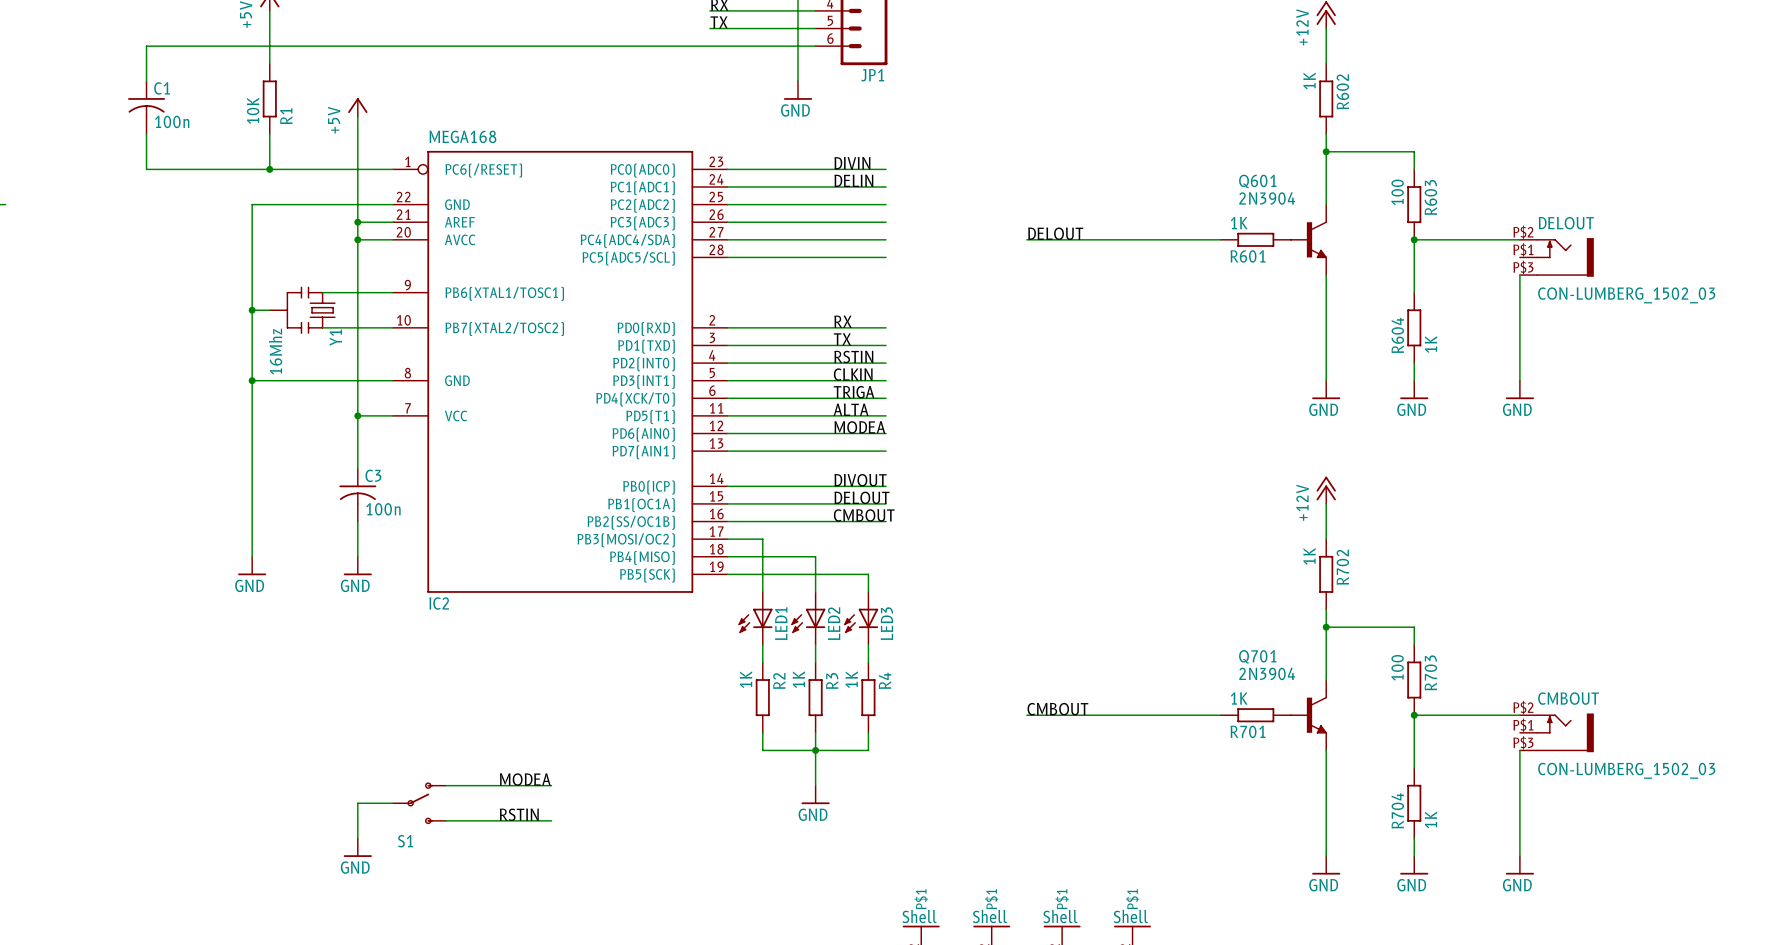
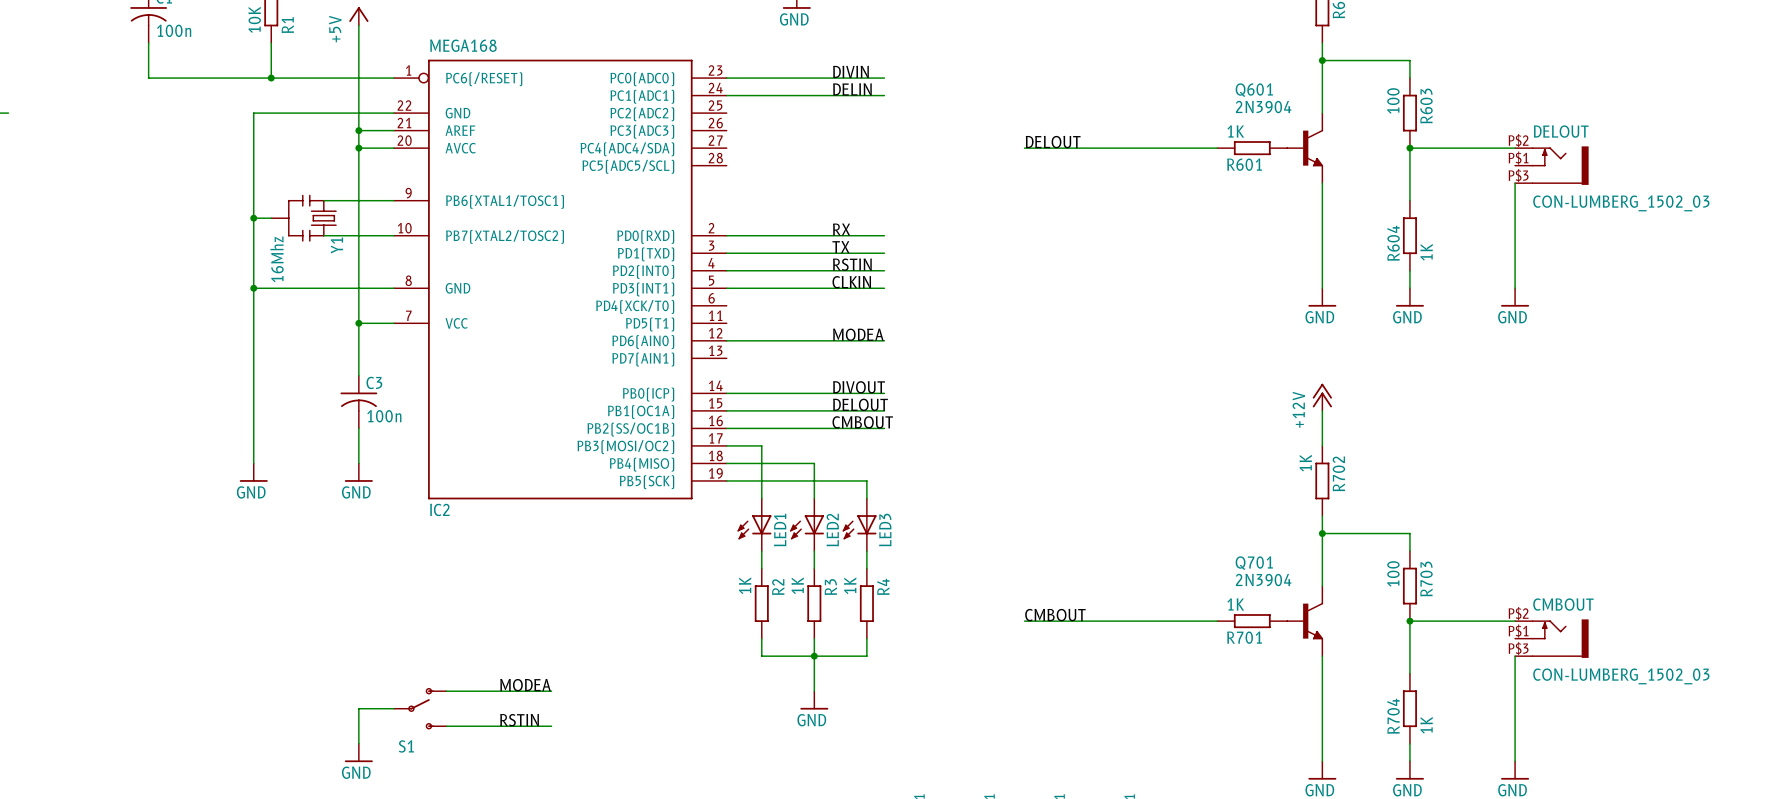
wire: (727, 204) (886, 204) -> none
wire: (727, 222) (886, 222) -> none
wire: (727, 239) (886, 239) -> none
wire: (727, 257) (886, 257) -> none
label: TRIGA (854, 392) -> none
wire: (727, 398) (886, 398) -> none
label: ALTA (851, 409) -> none
wire: (727, 415) (886, 415) -> none
wire: (727, 451) (886, 451) -> none

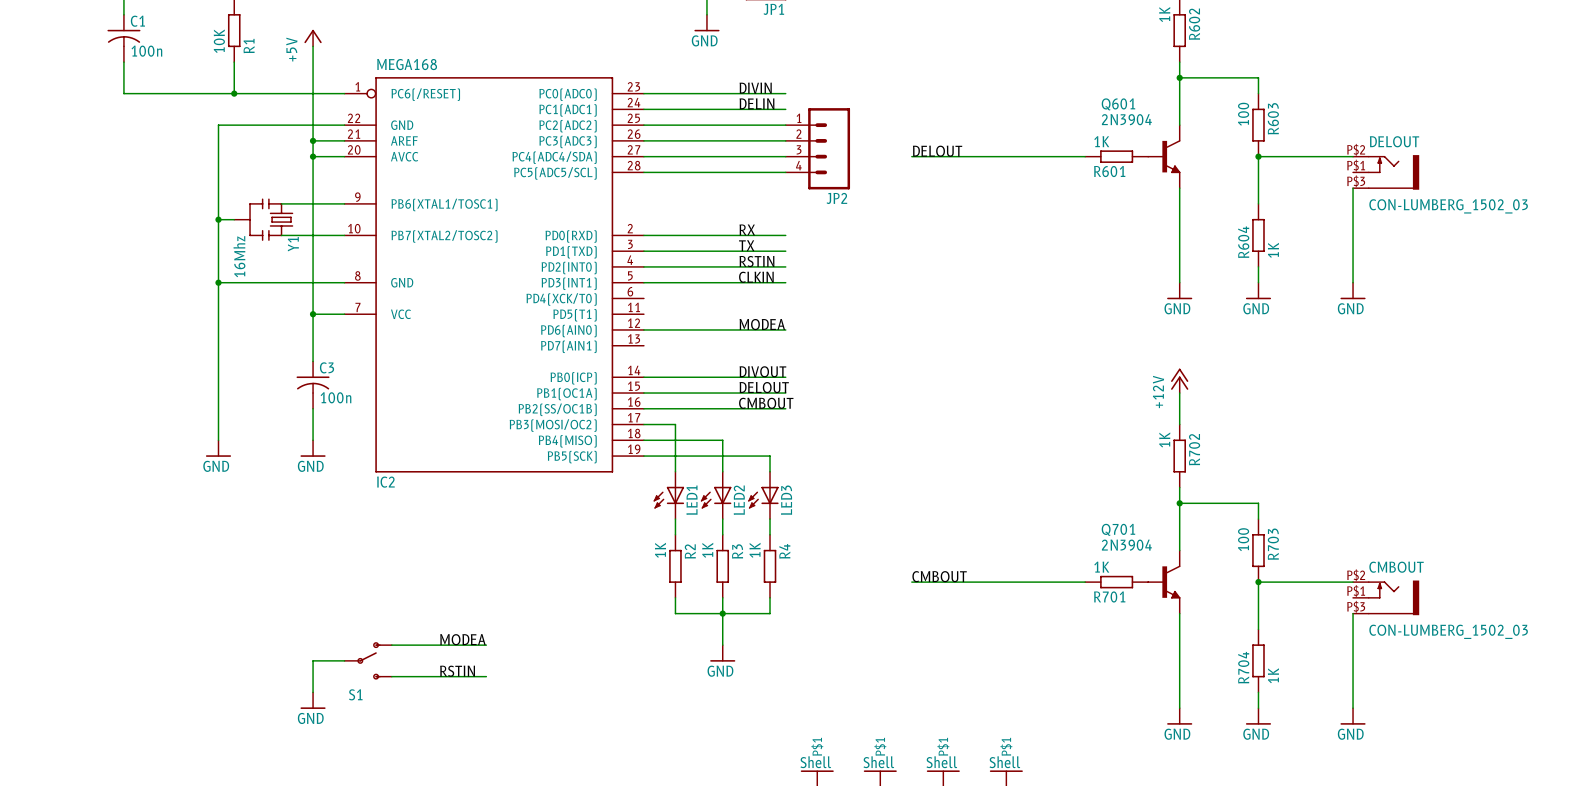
wire: none -> (643, 125) (785, 125)
wire: none -> (643, 140) (785, 140)
JP2: none -> (817, 148)
wire: none -> (643, 156) (785, 156)
wire: none -> (643, 172) (785, 172)

